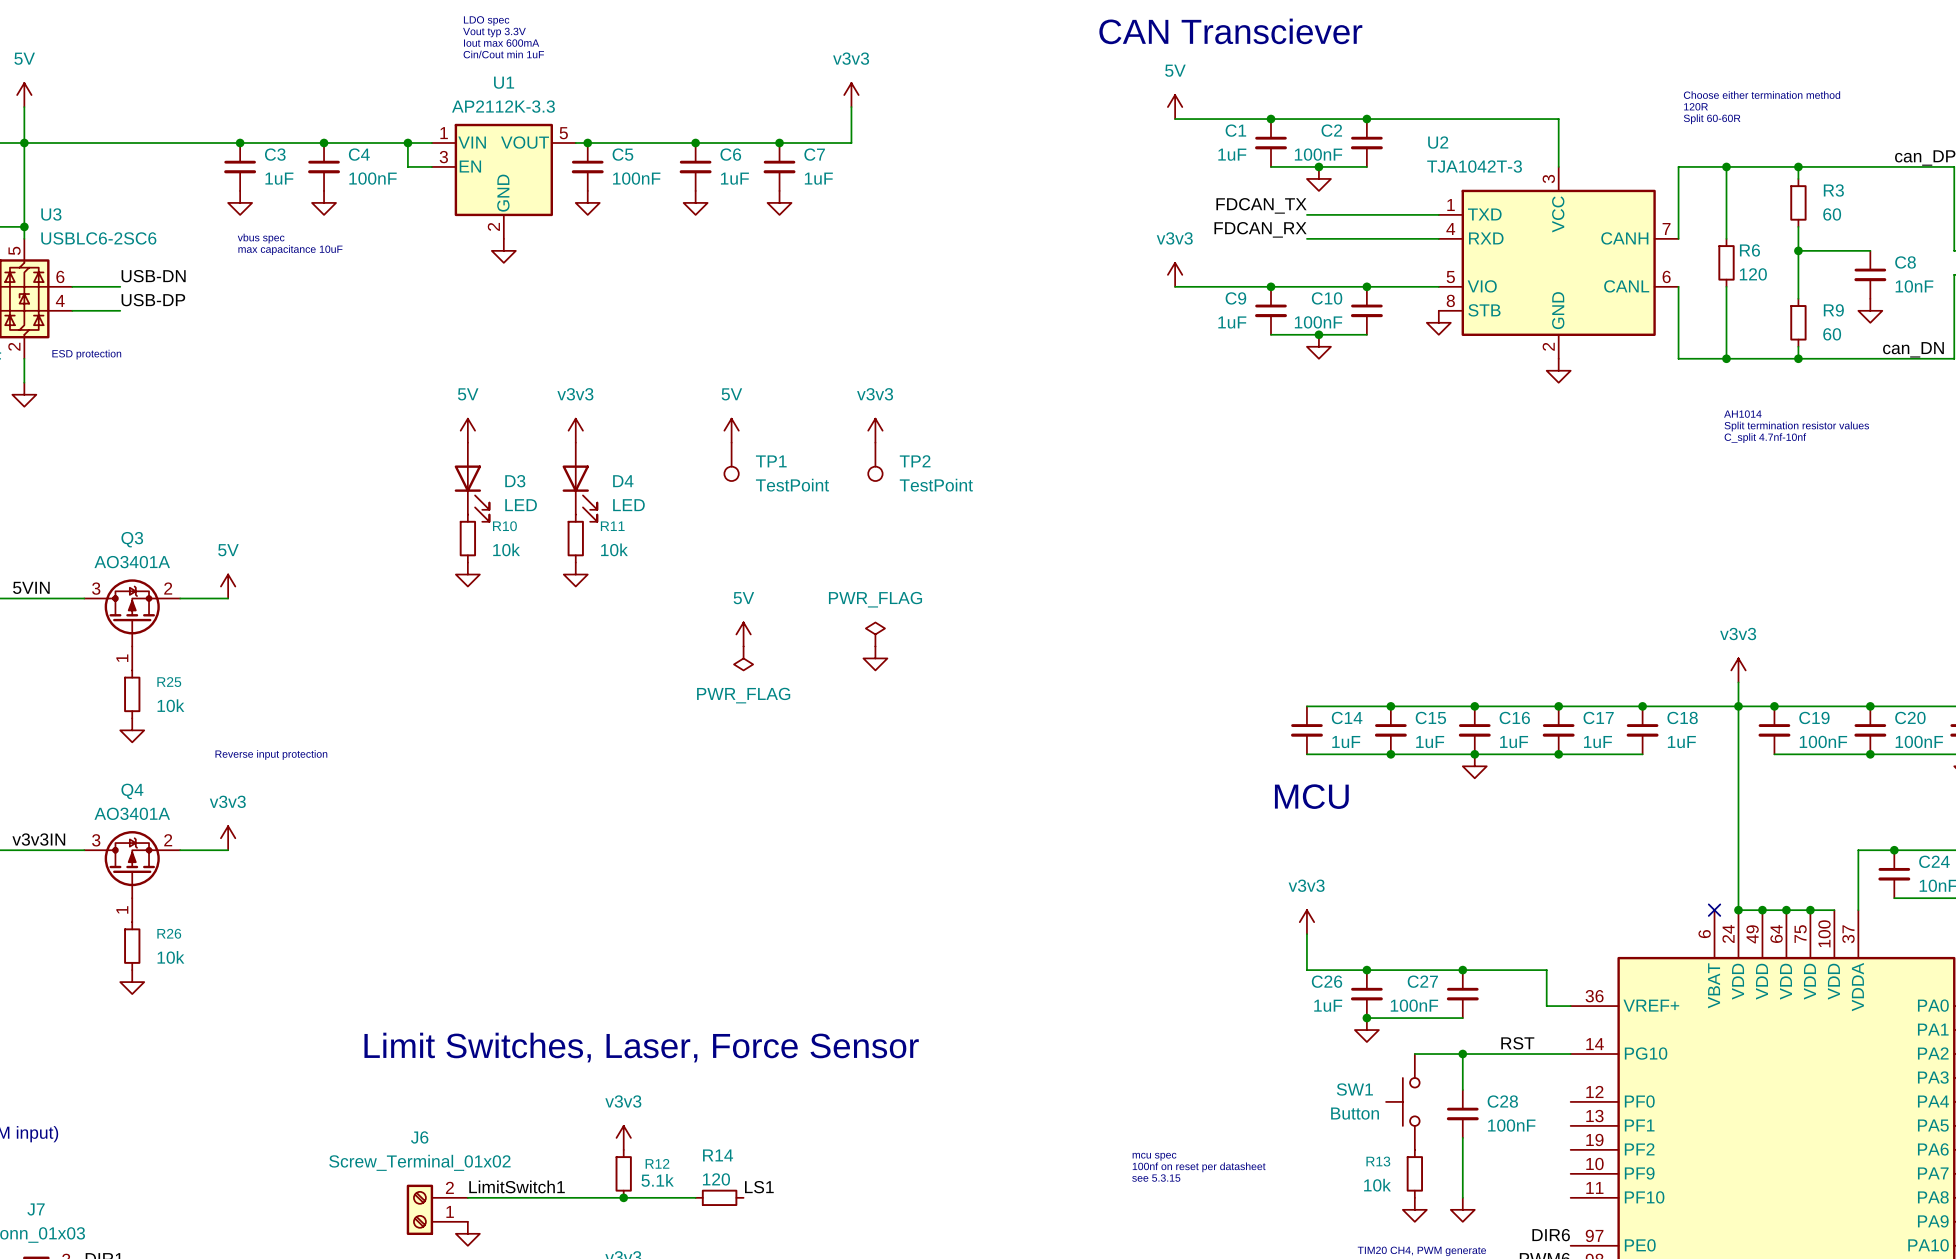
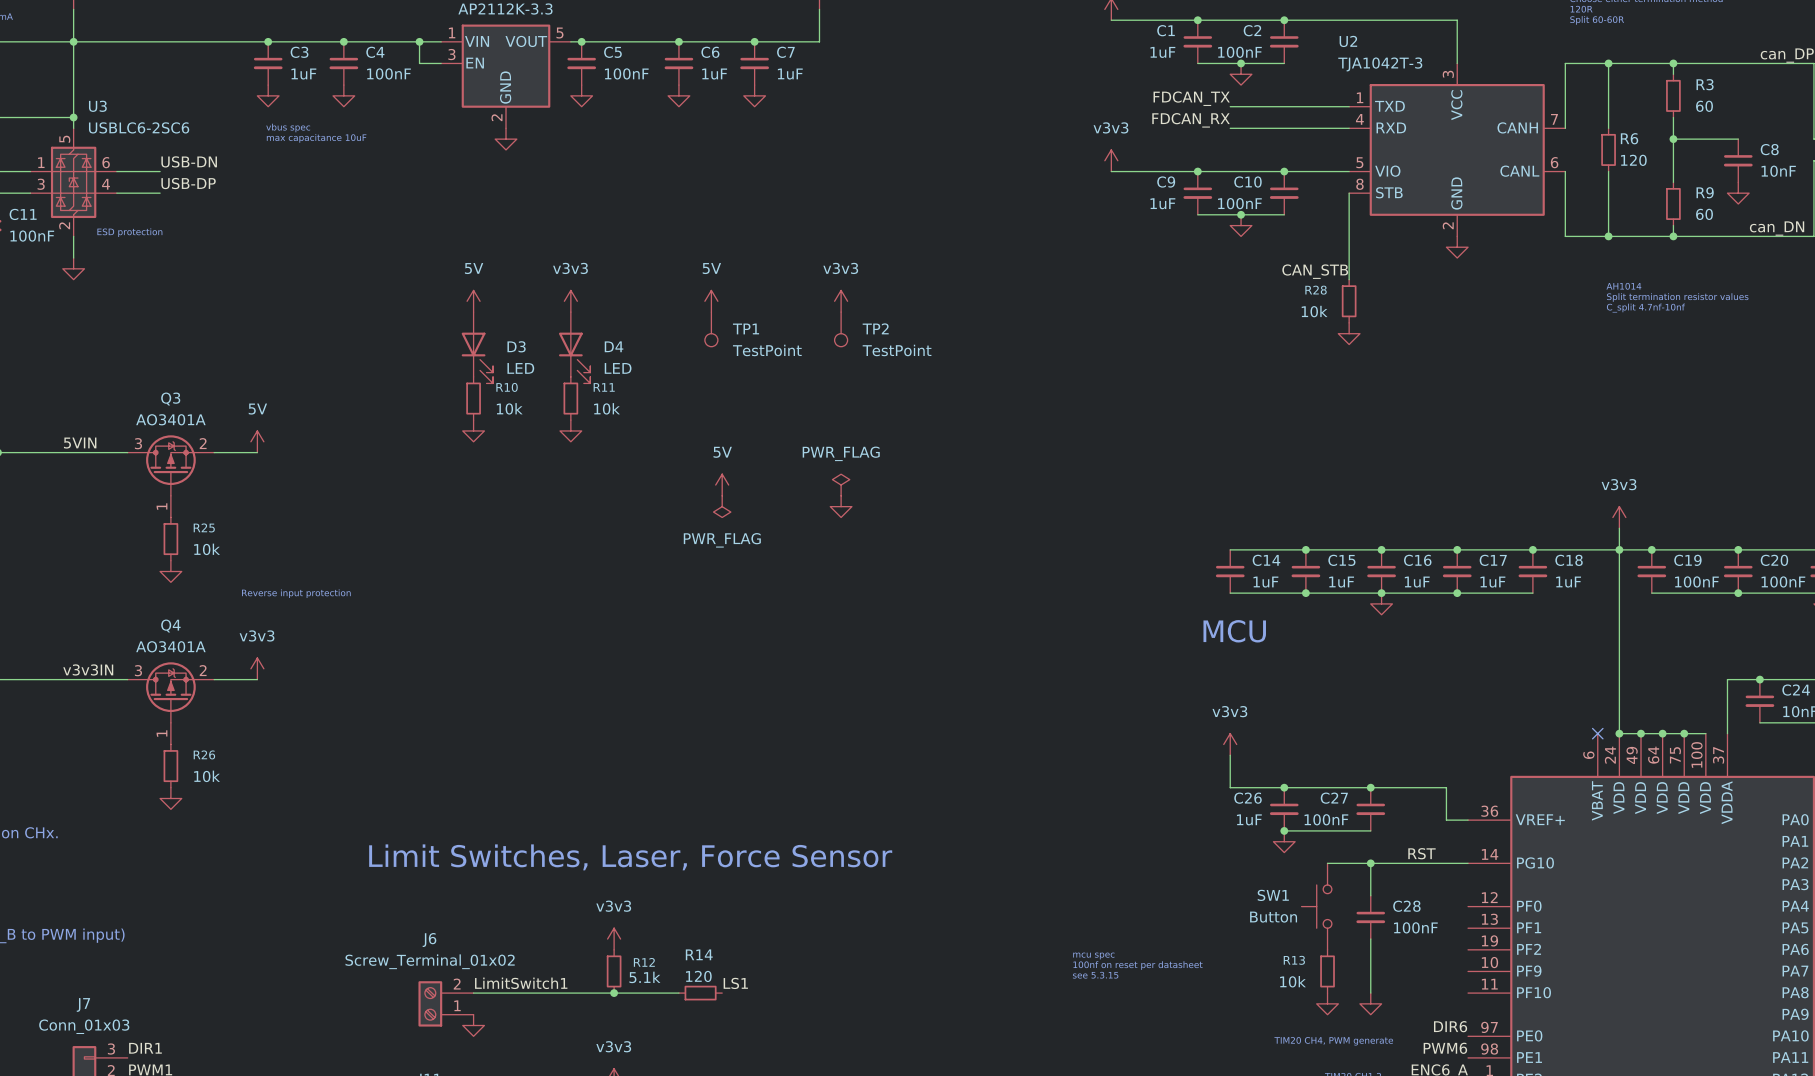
wire: none -> (1349, 193) (1349, 279)
power symbol position: (1438, 322) -> (1349, 333)
label: none -> CAN_STB (1315, 271)
R28: none -> 10k (1349, 301)

